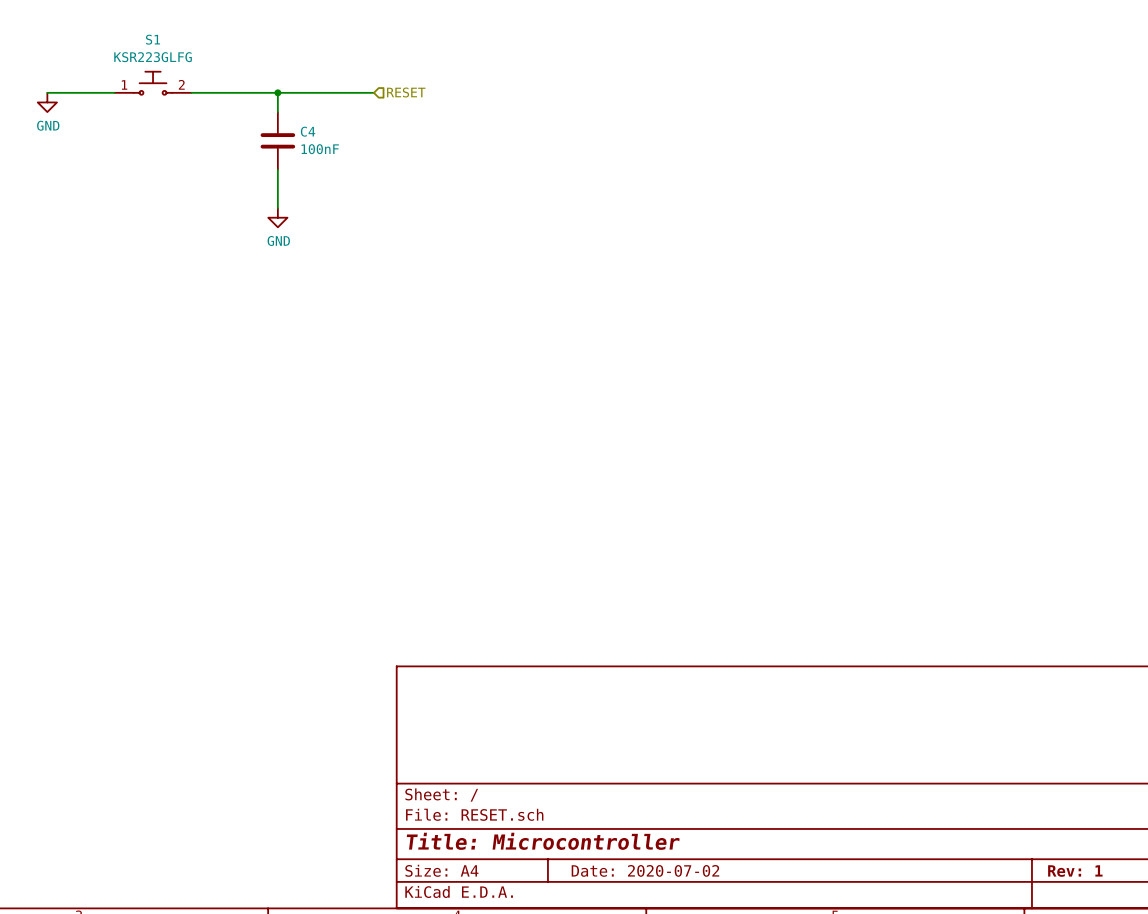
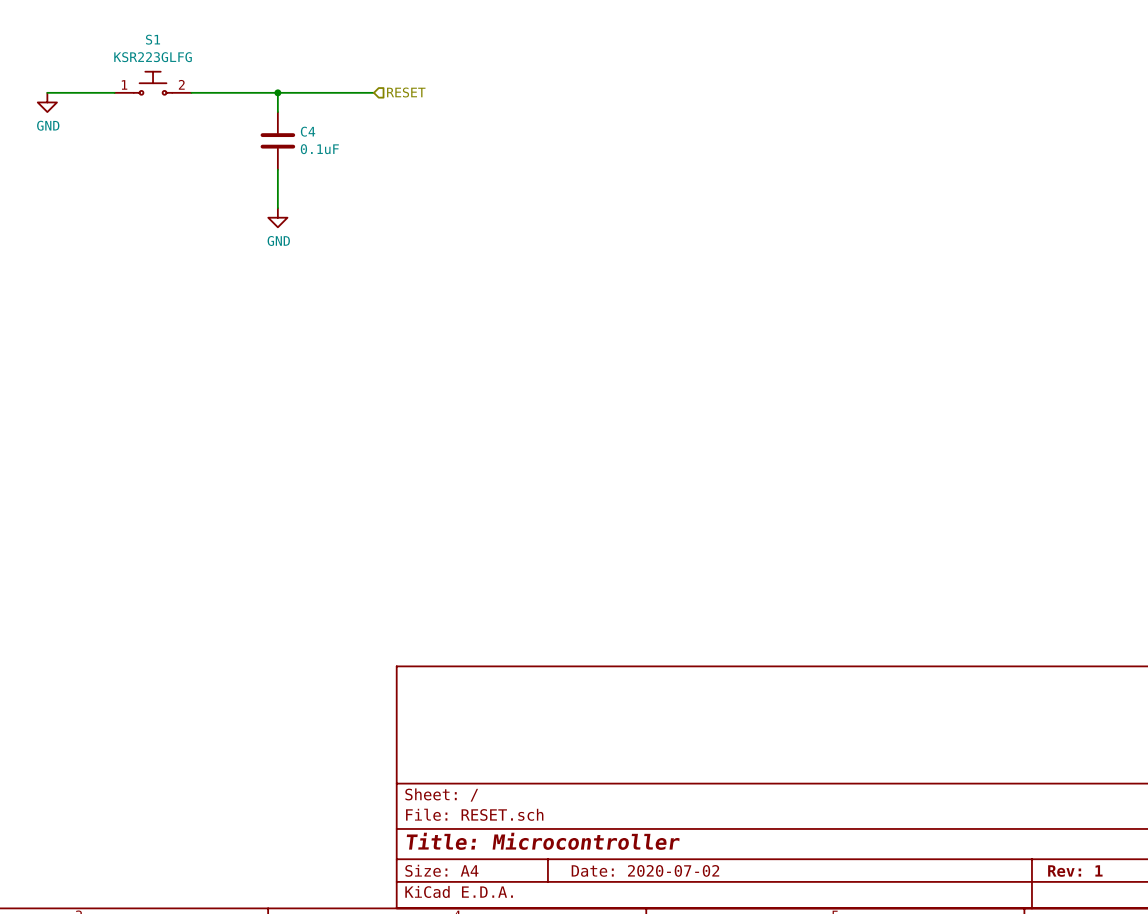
C4 value: 100nF (320, 149) -> 0.1uF (319, 149)

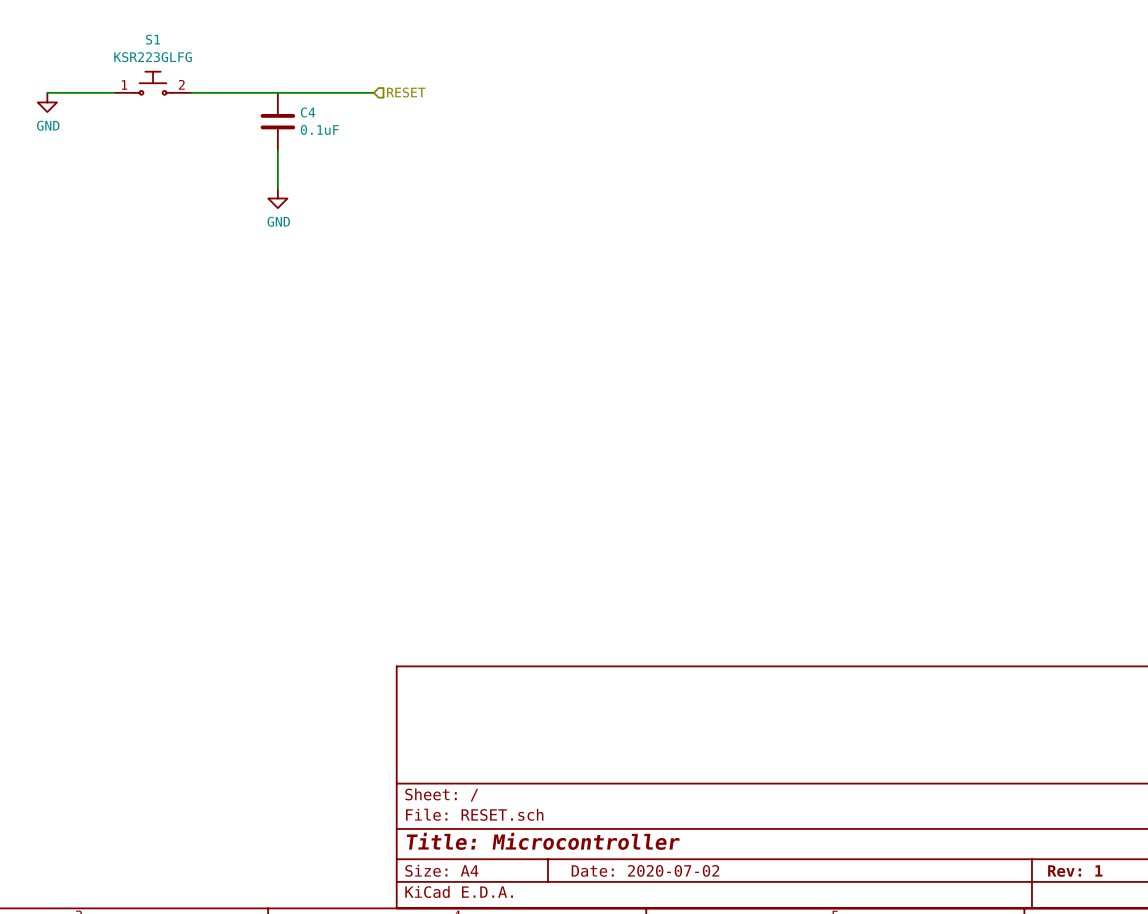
junction: (277, 92) -> none
C4 position: (277, 140) -> (277, 121)
power symbol position: GND (277, 217) -> GND (277, 198)

